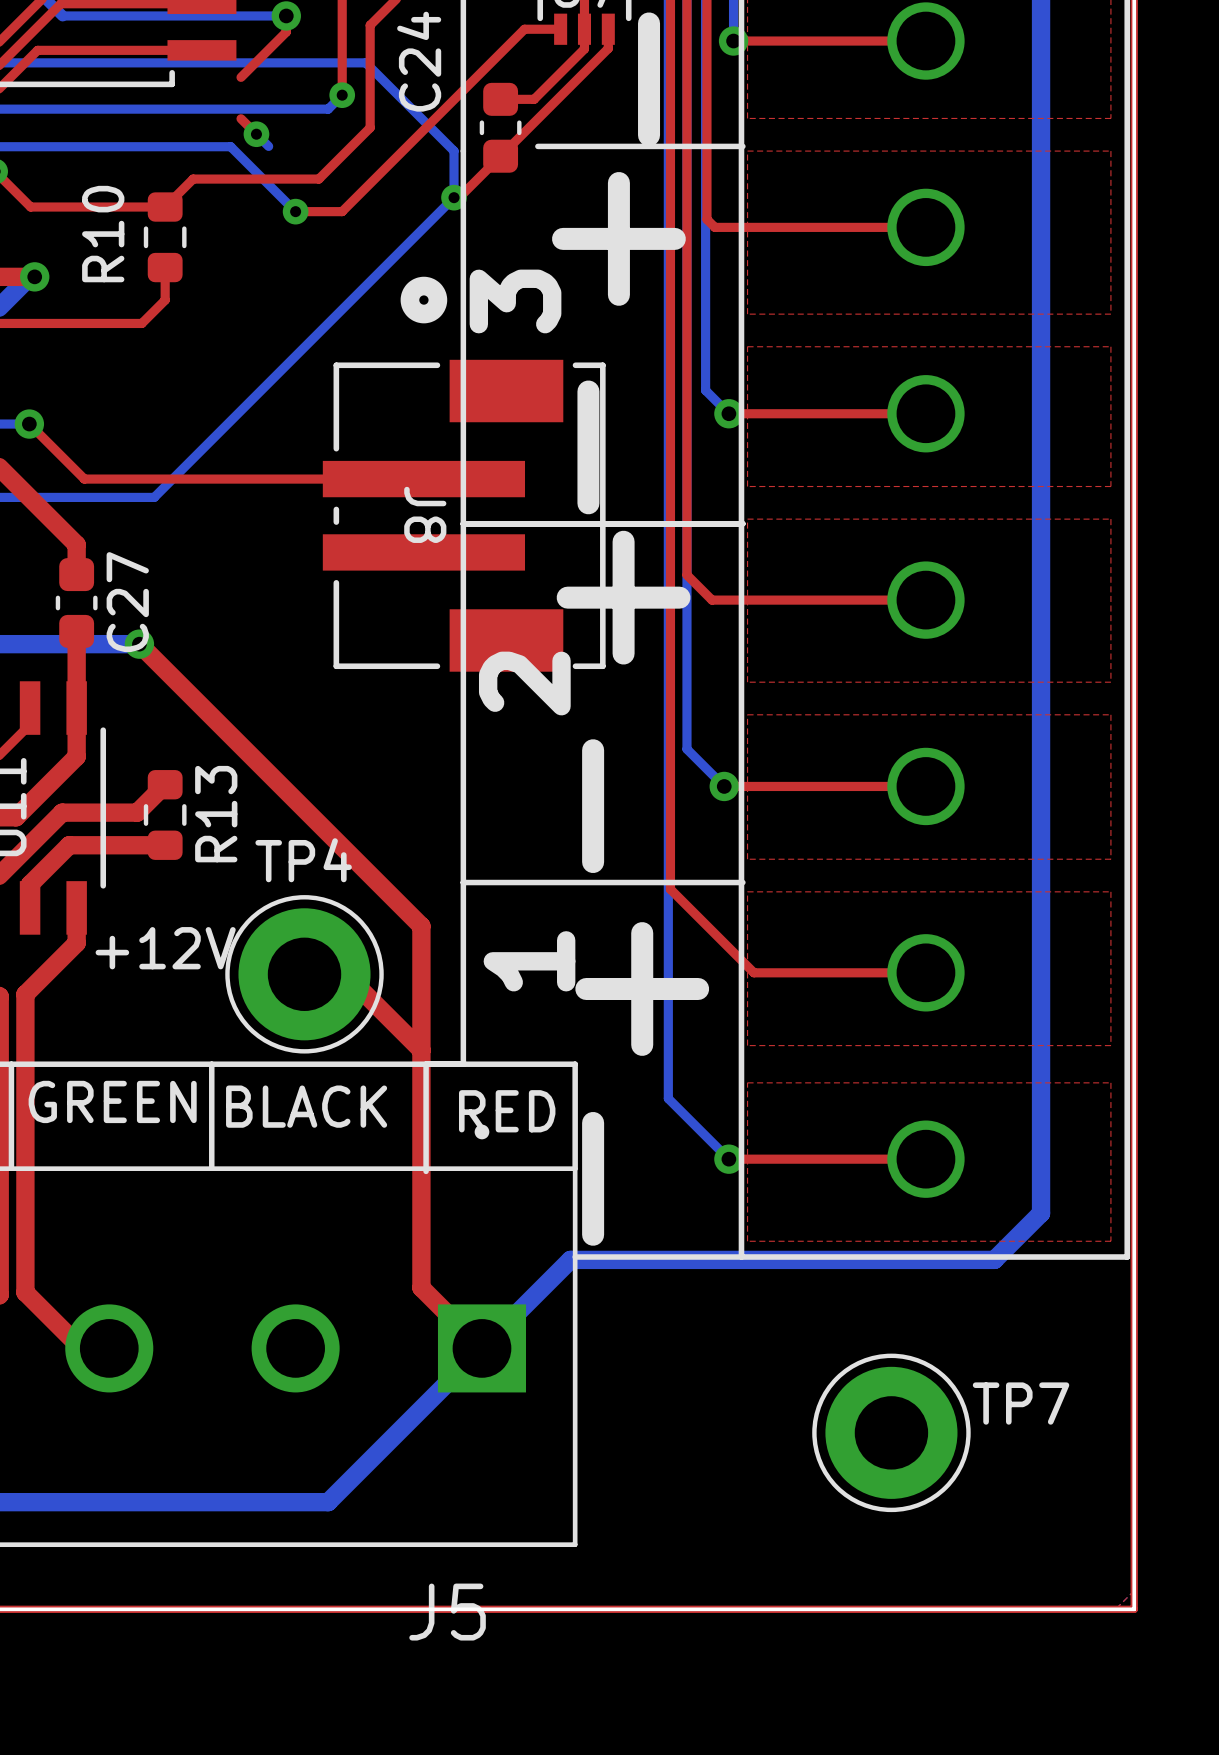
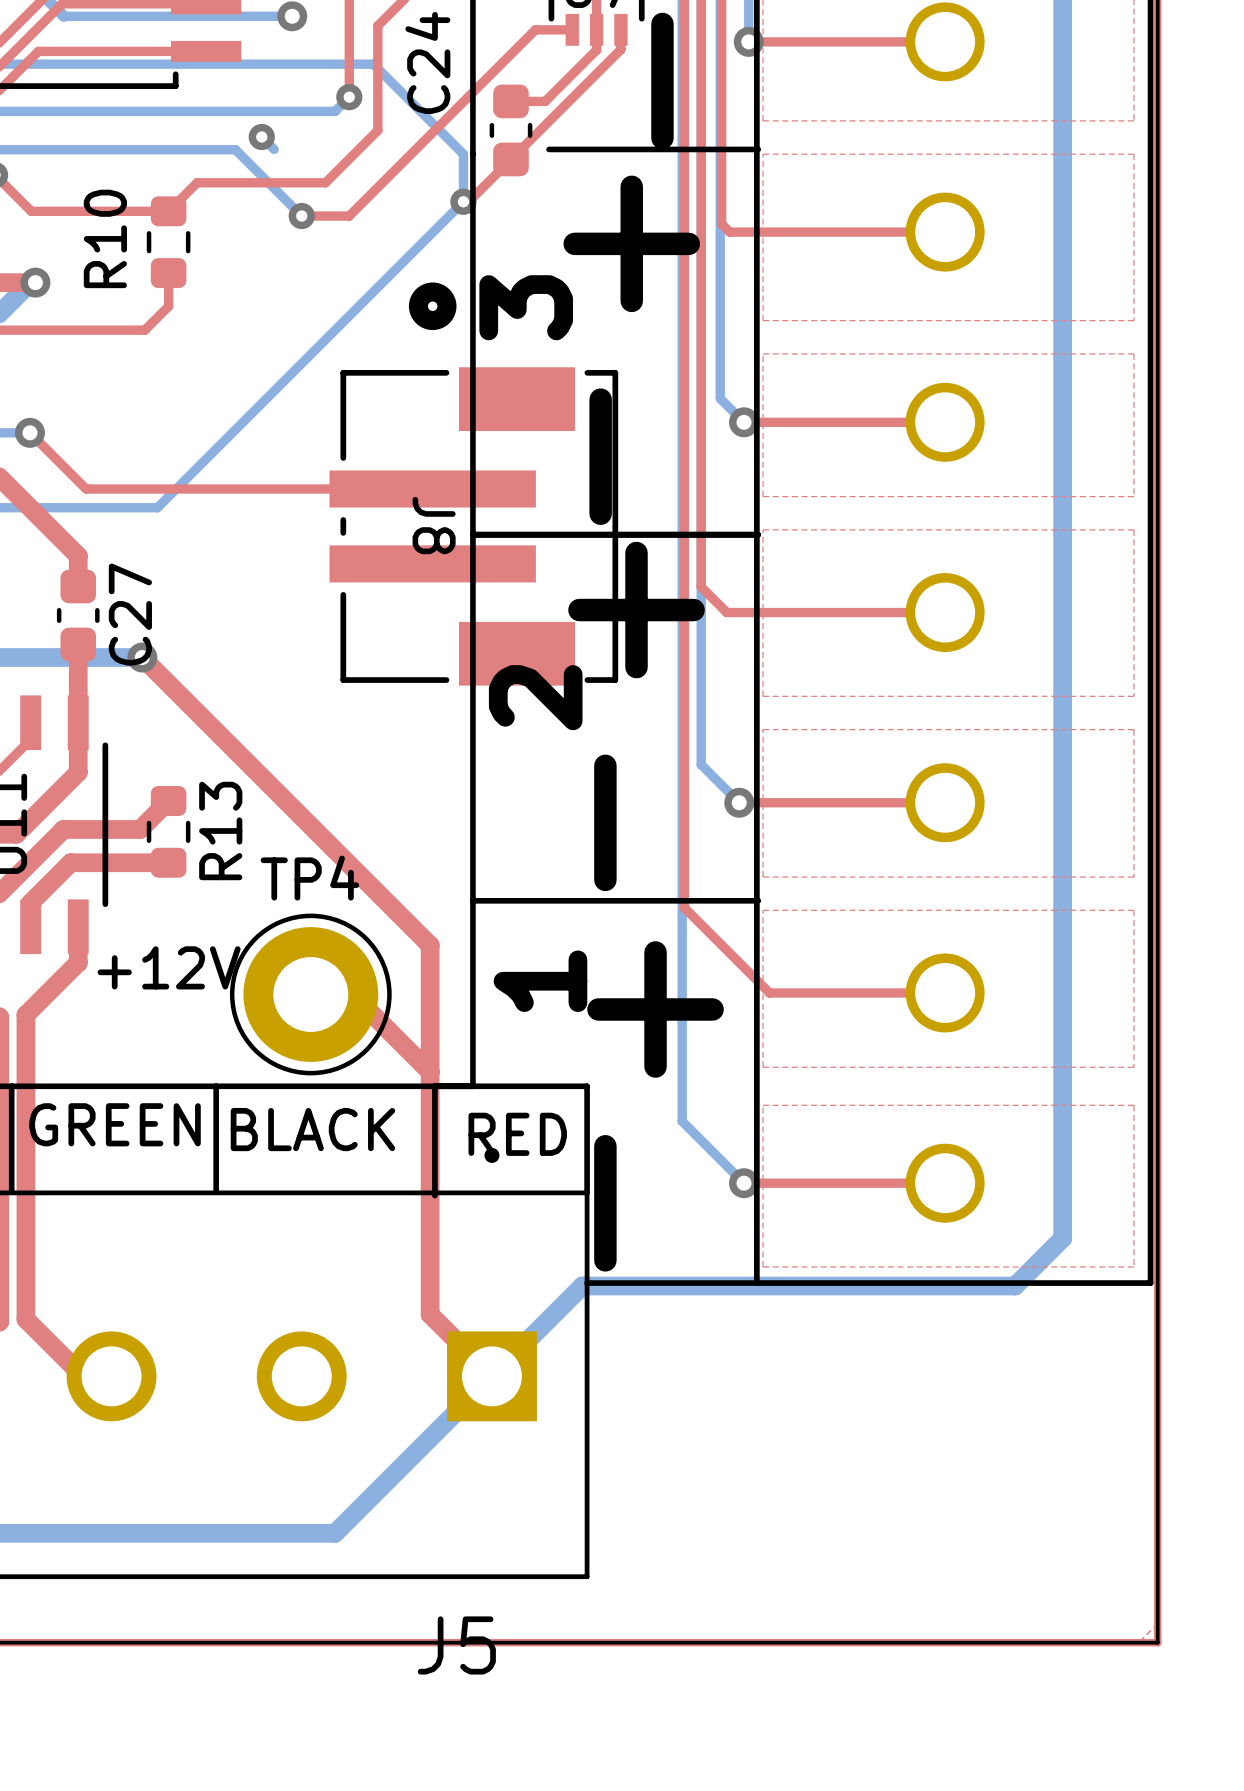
top track: (286, 15) (286, 32) (241, 77) -> none
top track: (241, 118) (256, 134) -> none
TP7: (891, 1432) -> none

